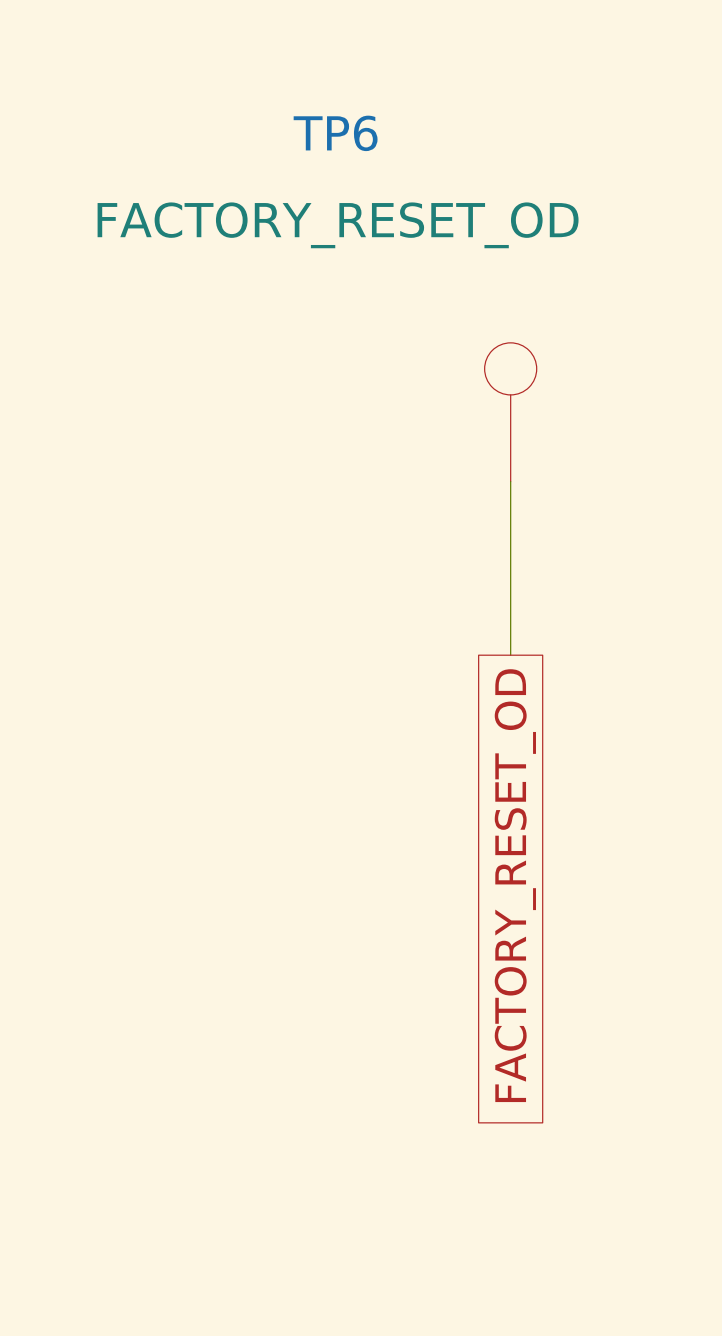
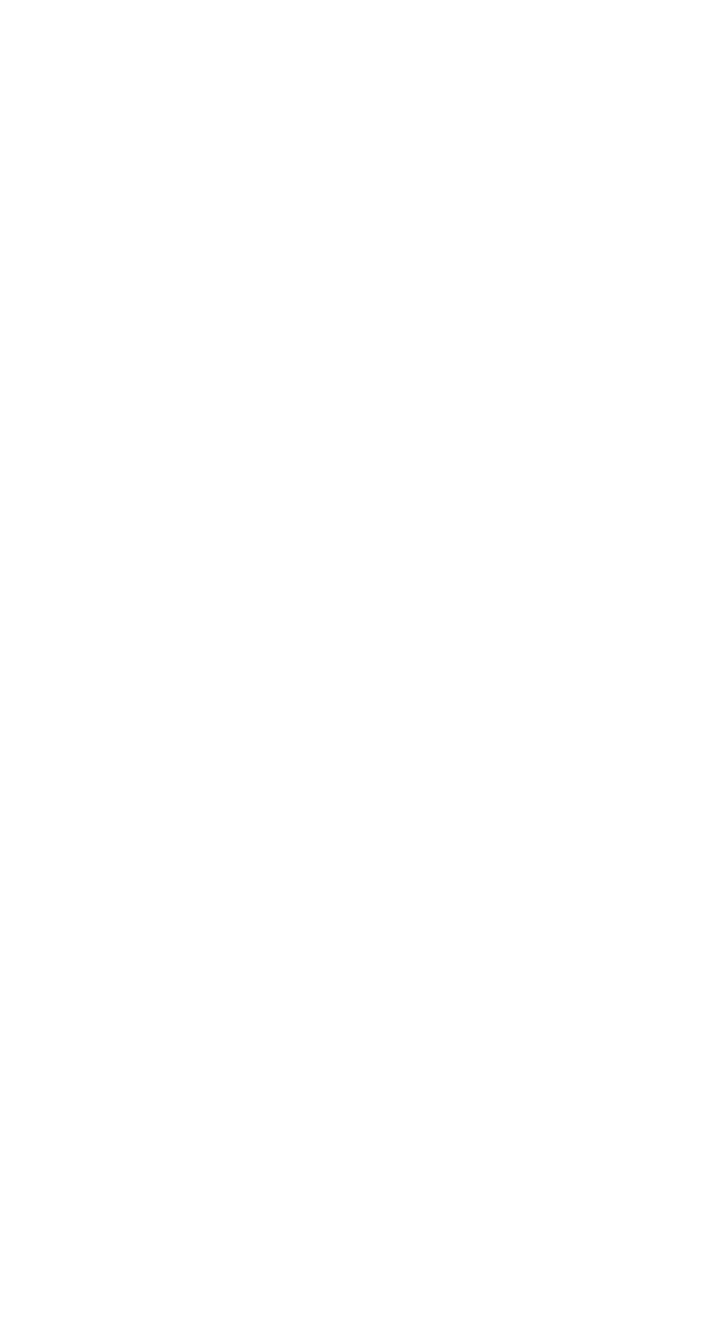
TP6: FACTORY_RESET_OD (510, 412) -> none
wire: (510, 481) (510, 655) -> none
global label: FACTORY_RESET_OD (515, 885) -> none

